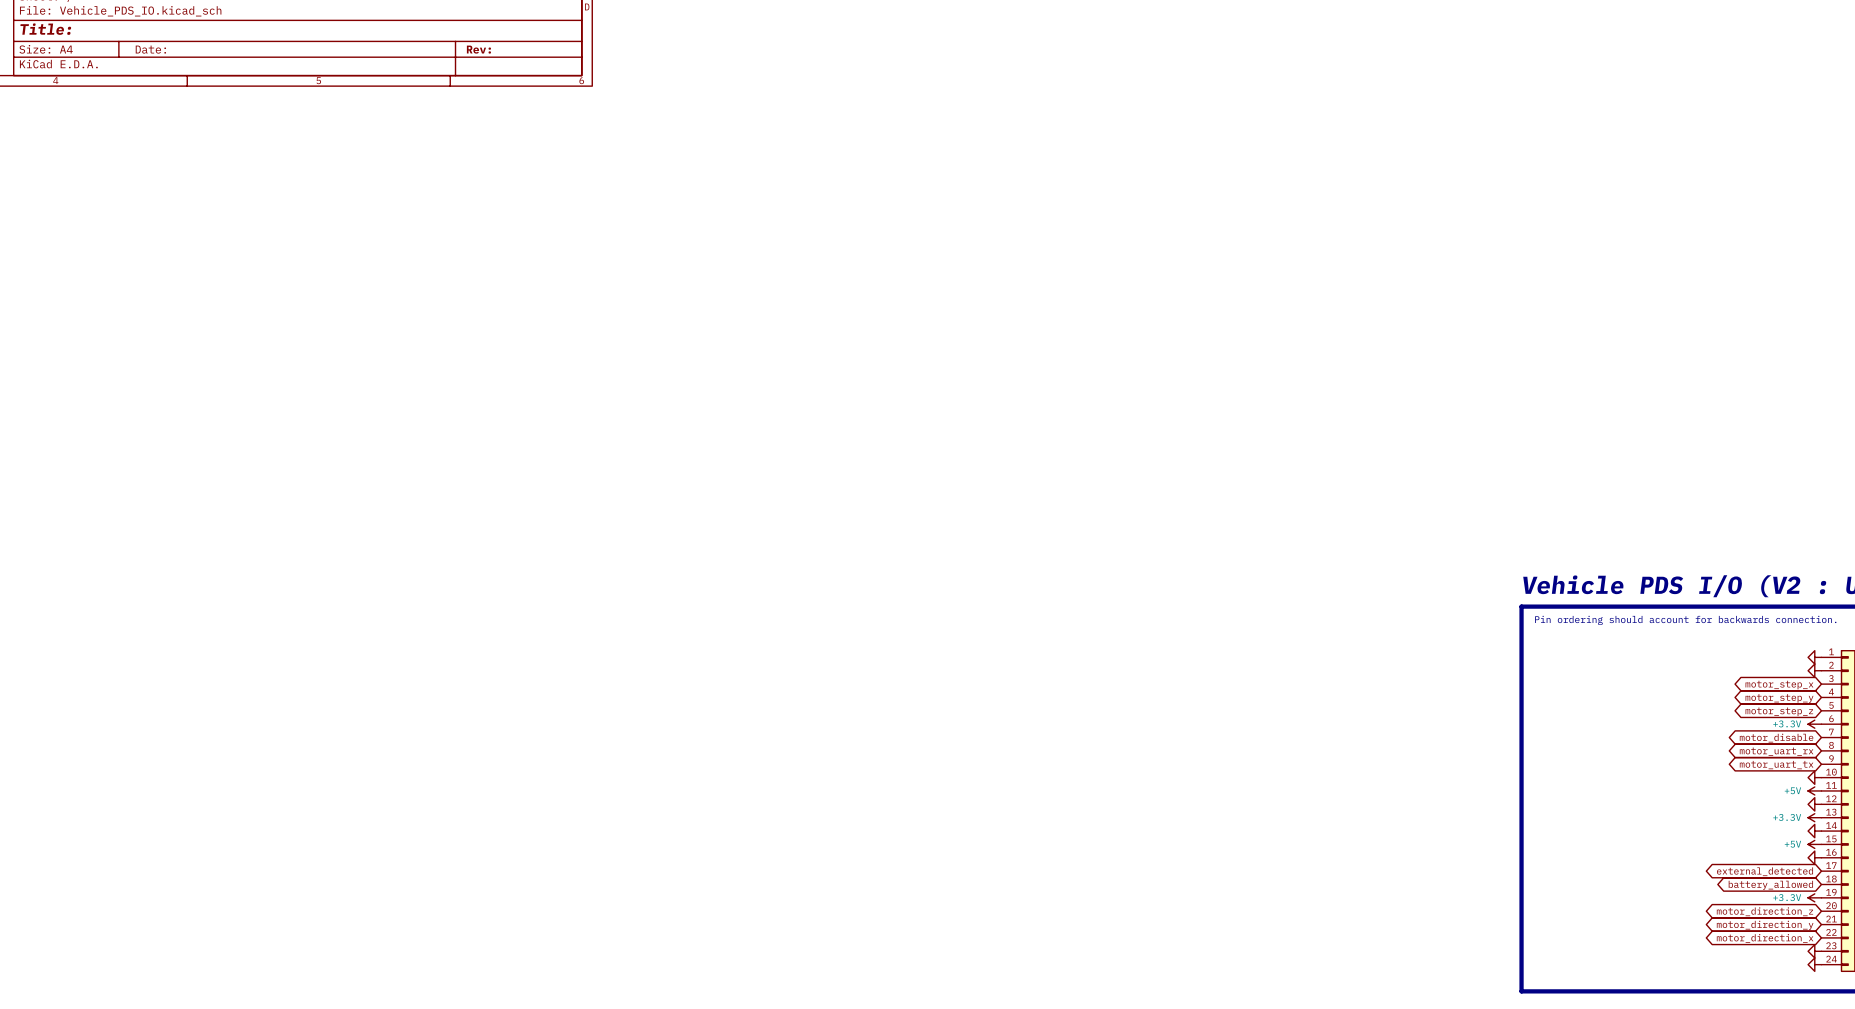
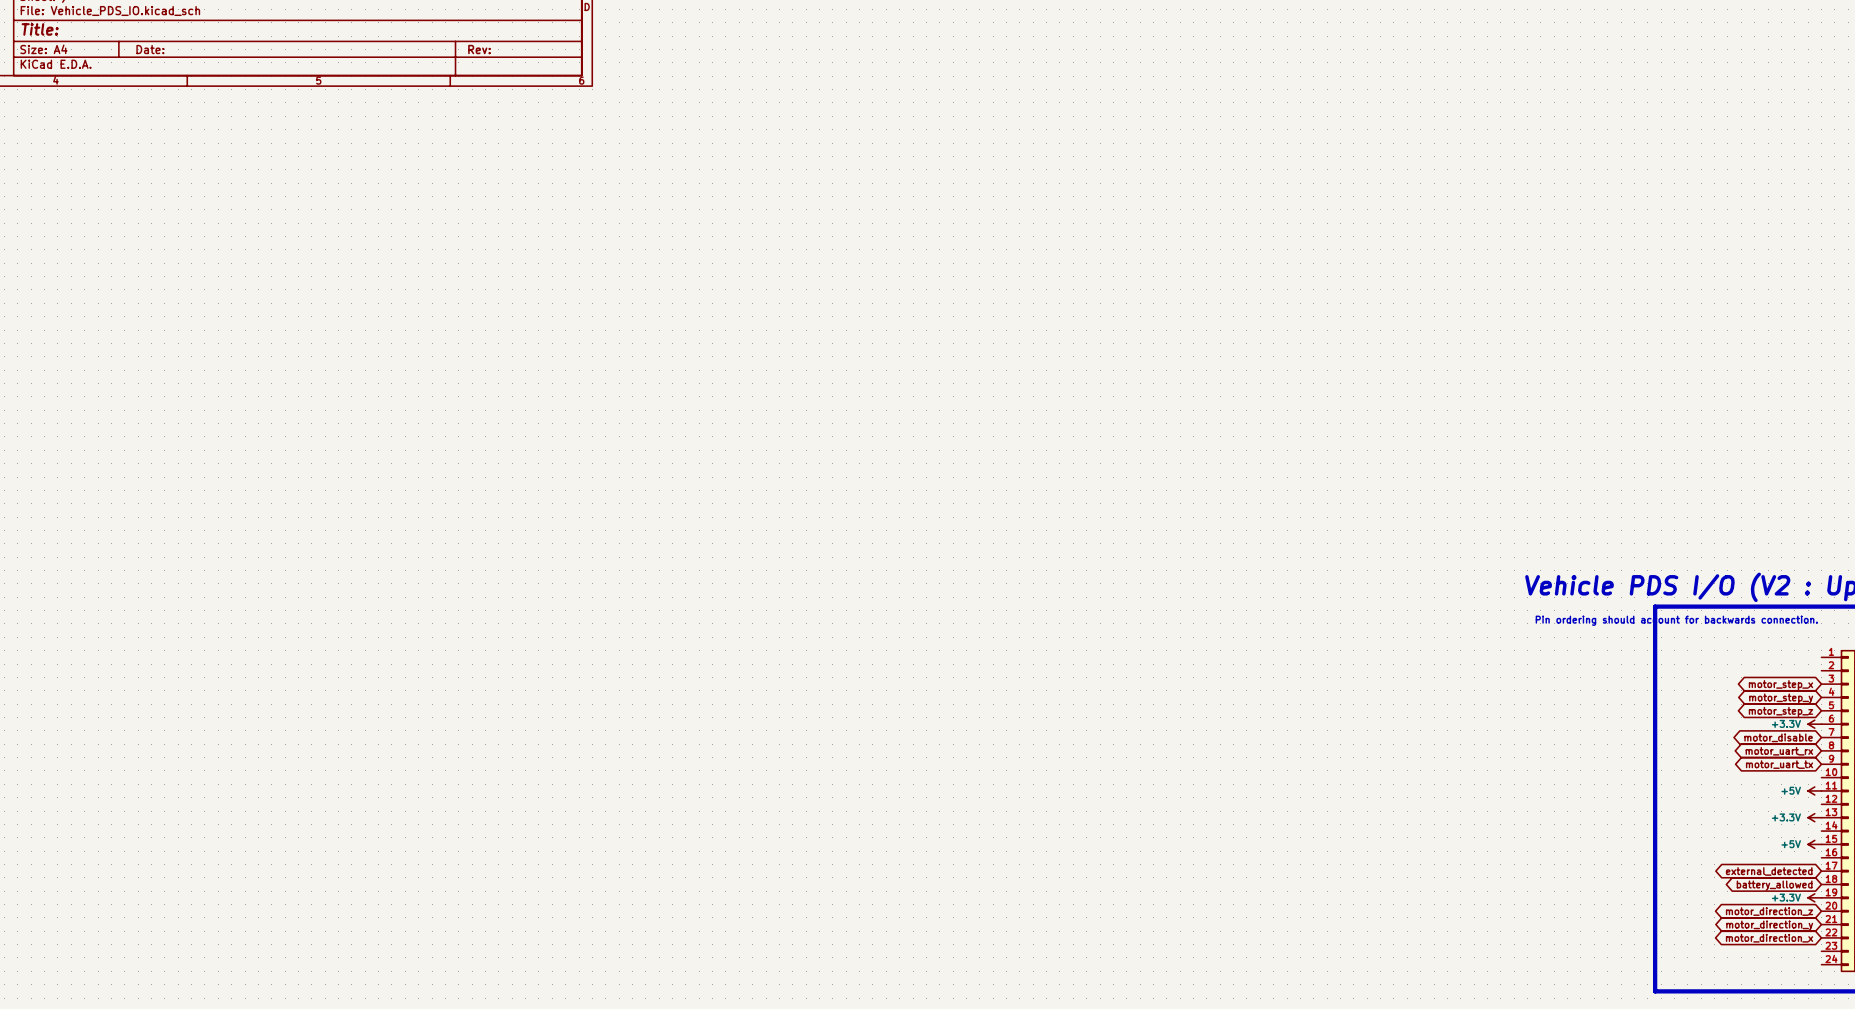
line: (1655, 606) (1521, 606) (1521, 991) (1655, 991) -> (1655, 606) (1655, 991)
power symbol: (1814, 657) -> none
power symbol: (1814, 670) -> none
power symbol: (1814, 777) -> none
power symbol: (1814, 804) -> none
power symbol: (1814, 831) -> none
power symbol: (1814, 857) -> none
power symbol: (1814, 951) -> none
power symbol: (1814, 964) -> none

